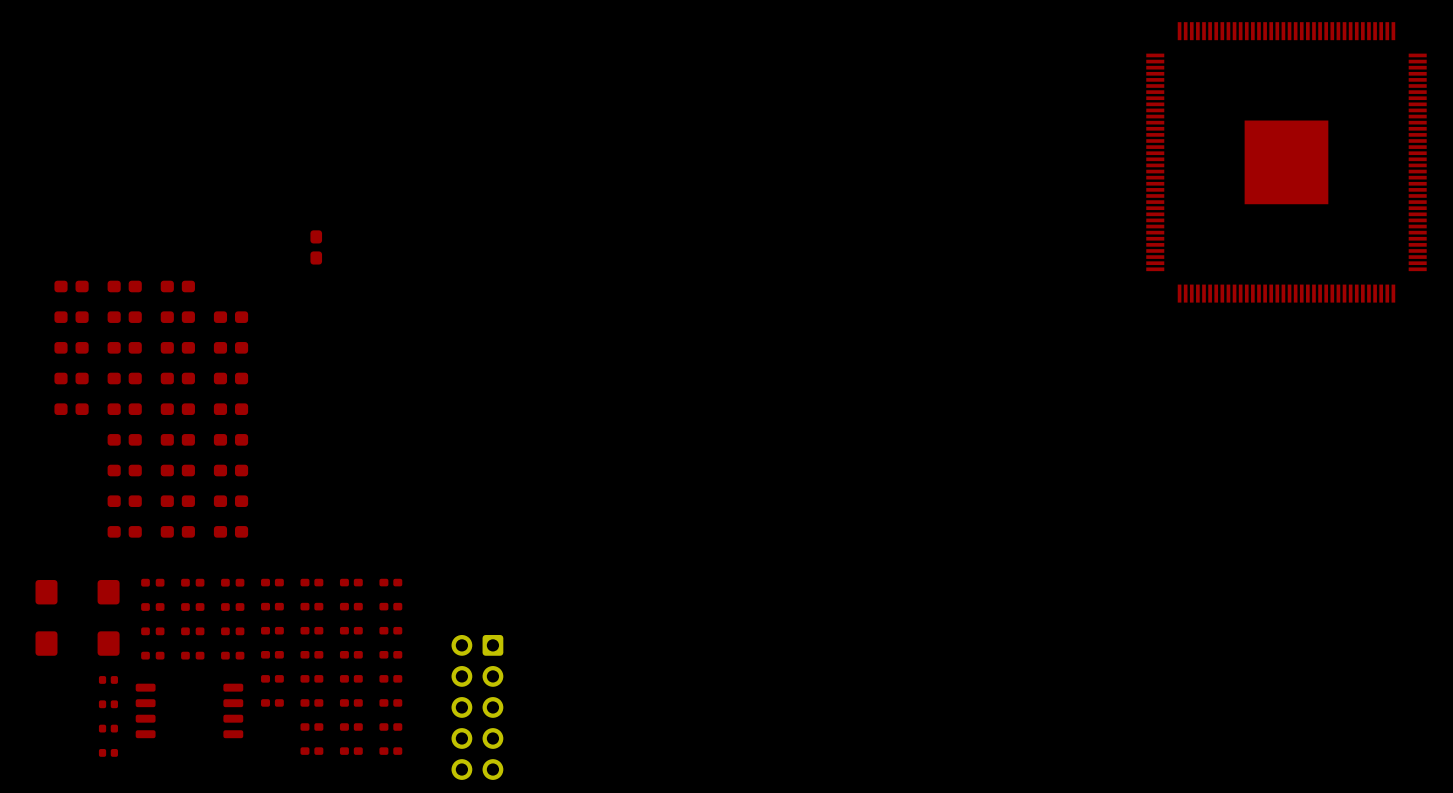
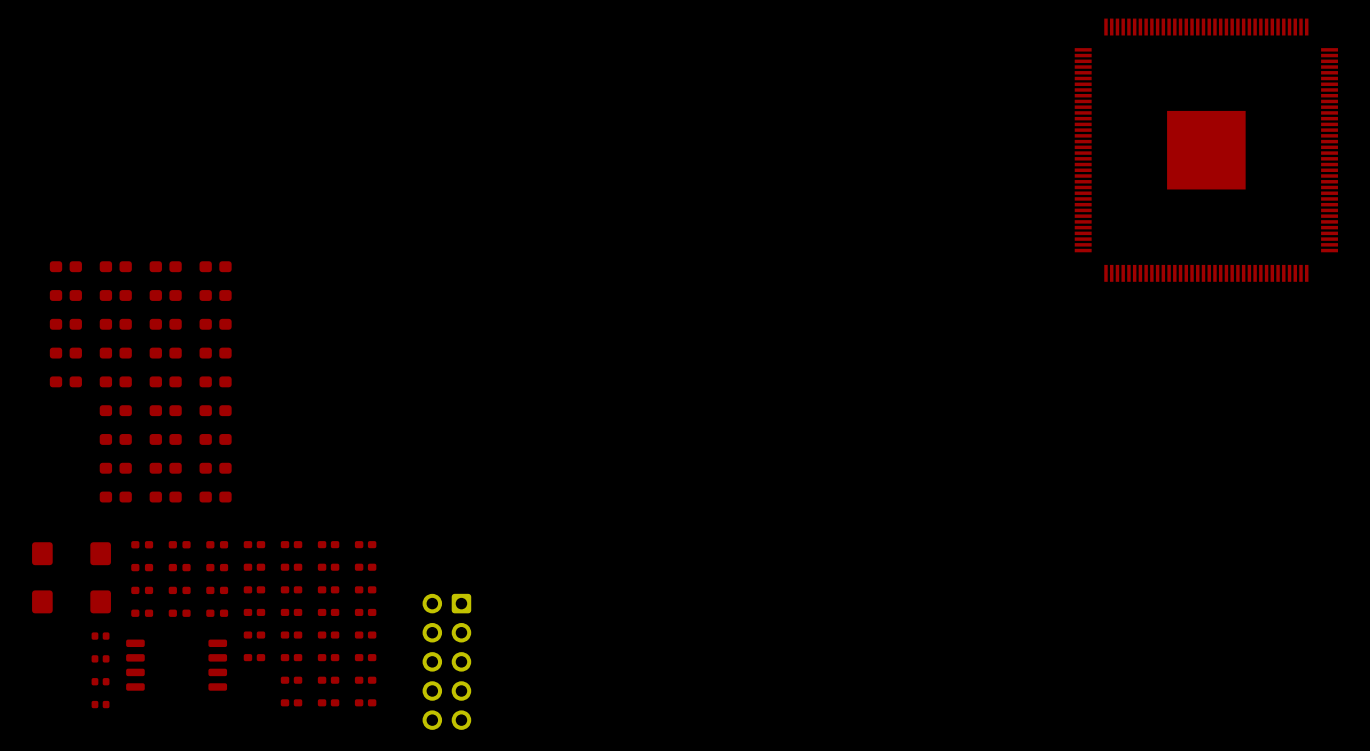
part rotation: 0° (316, 247) -> 90° clockwise (215, 266)
part position: (316, 247) -> (215, 266)

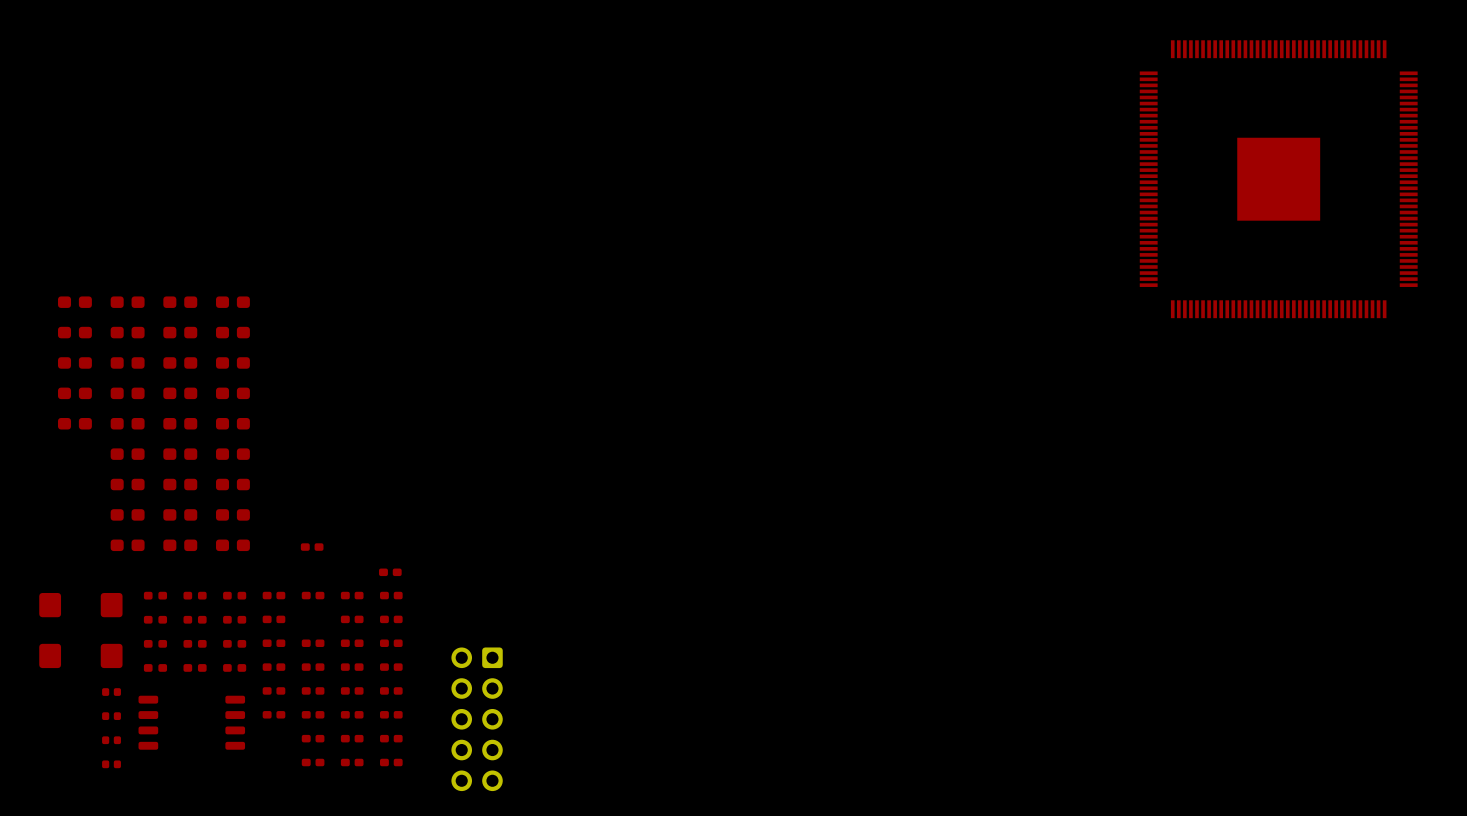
part: none -> (312, 547)
part: none -> (390, 572)
part: (291, 567) -> none

